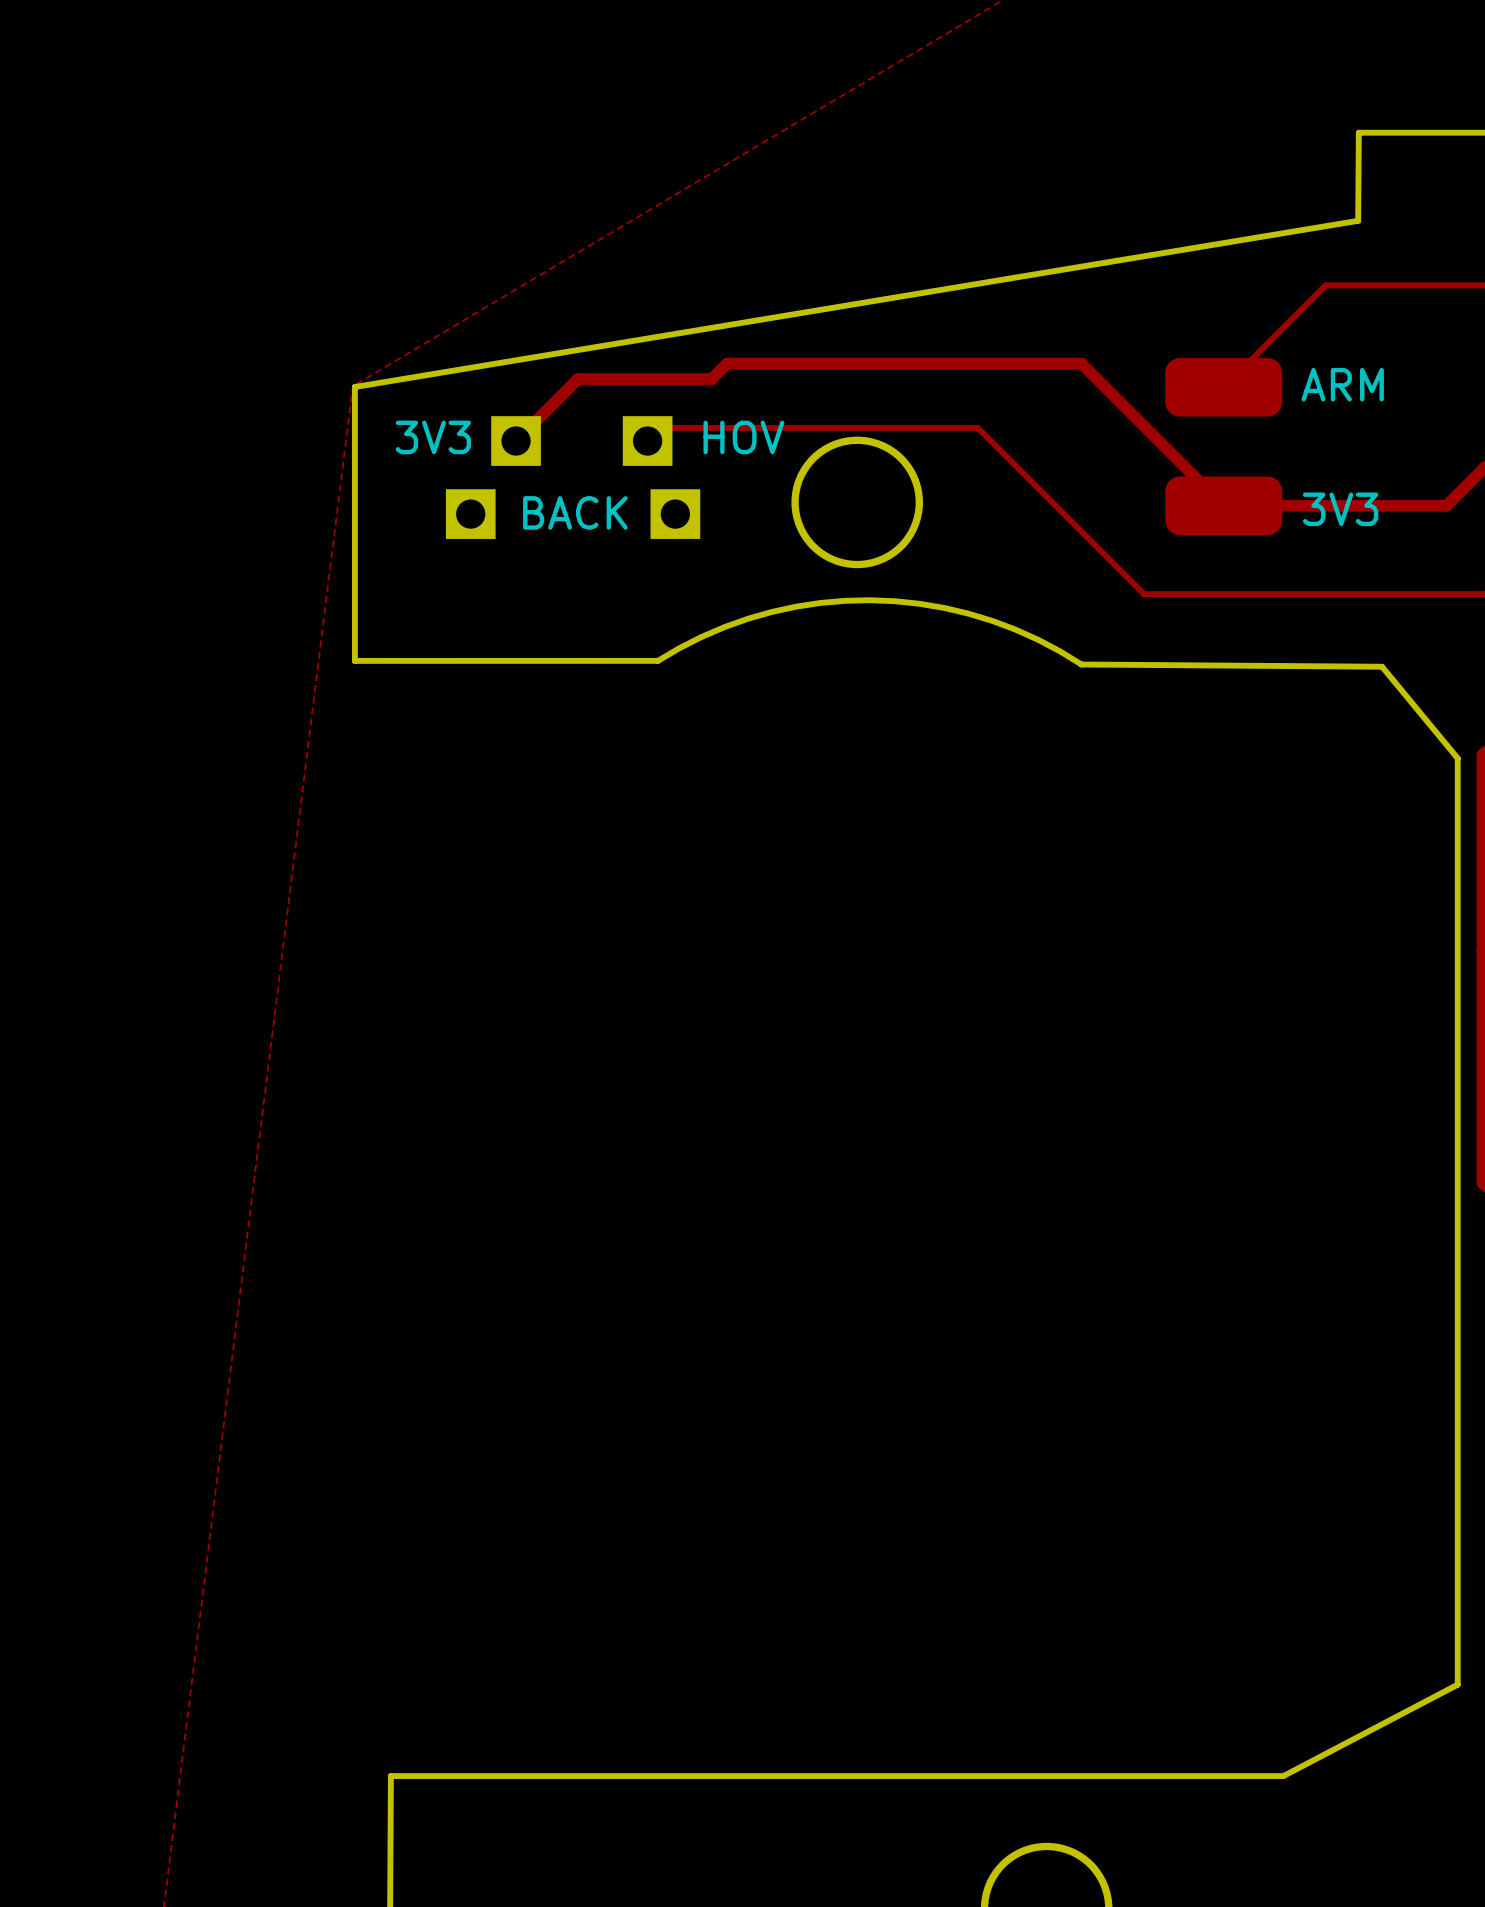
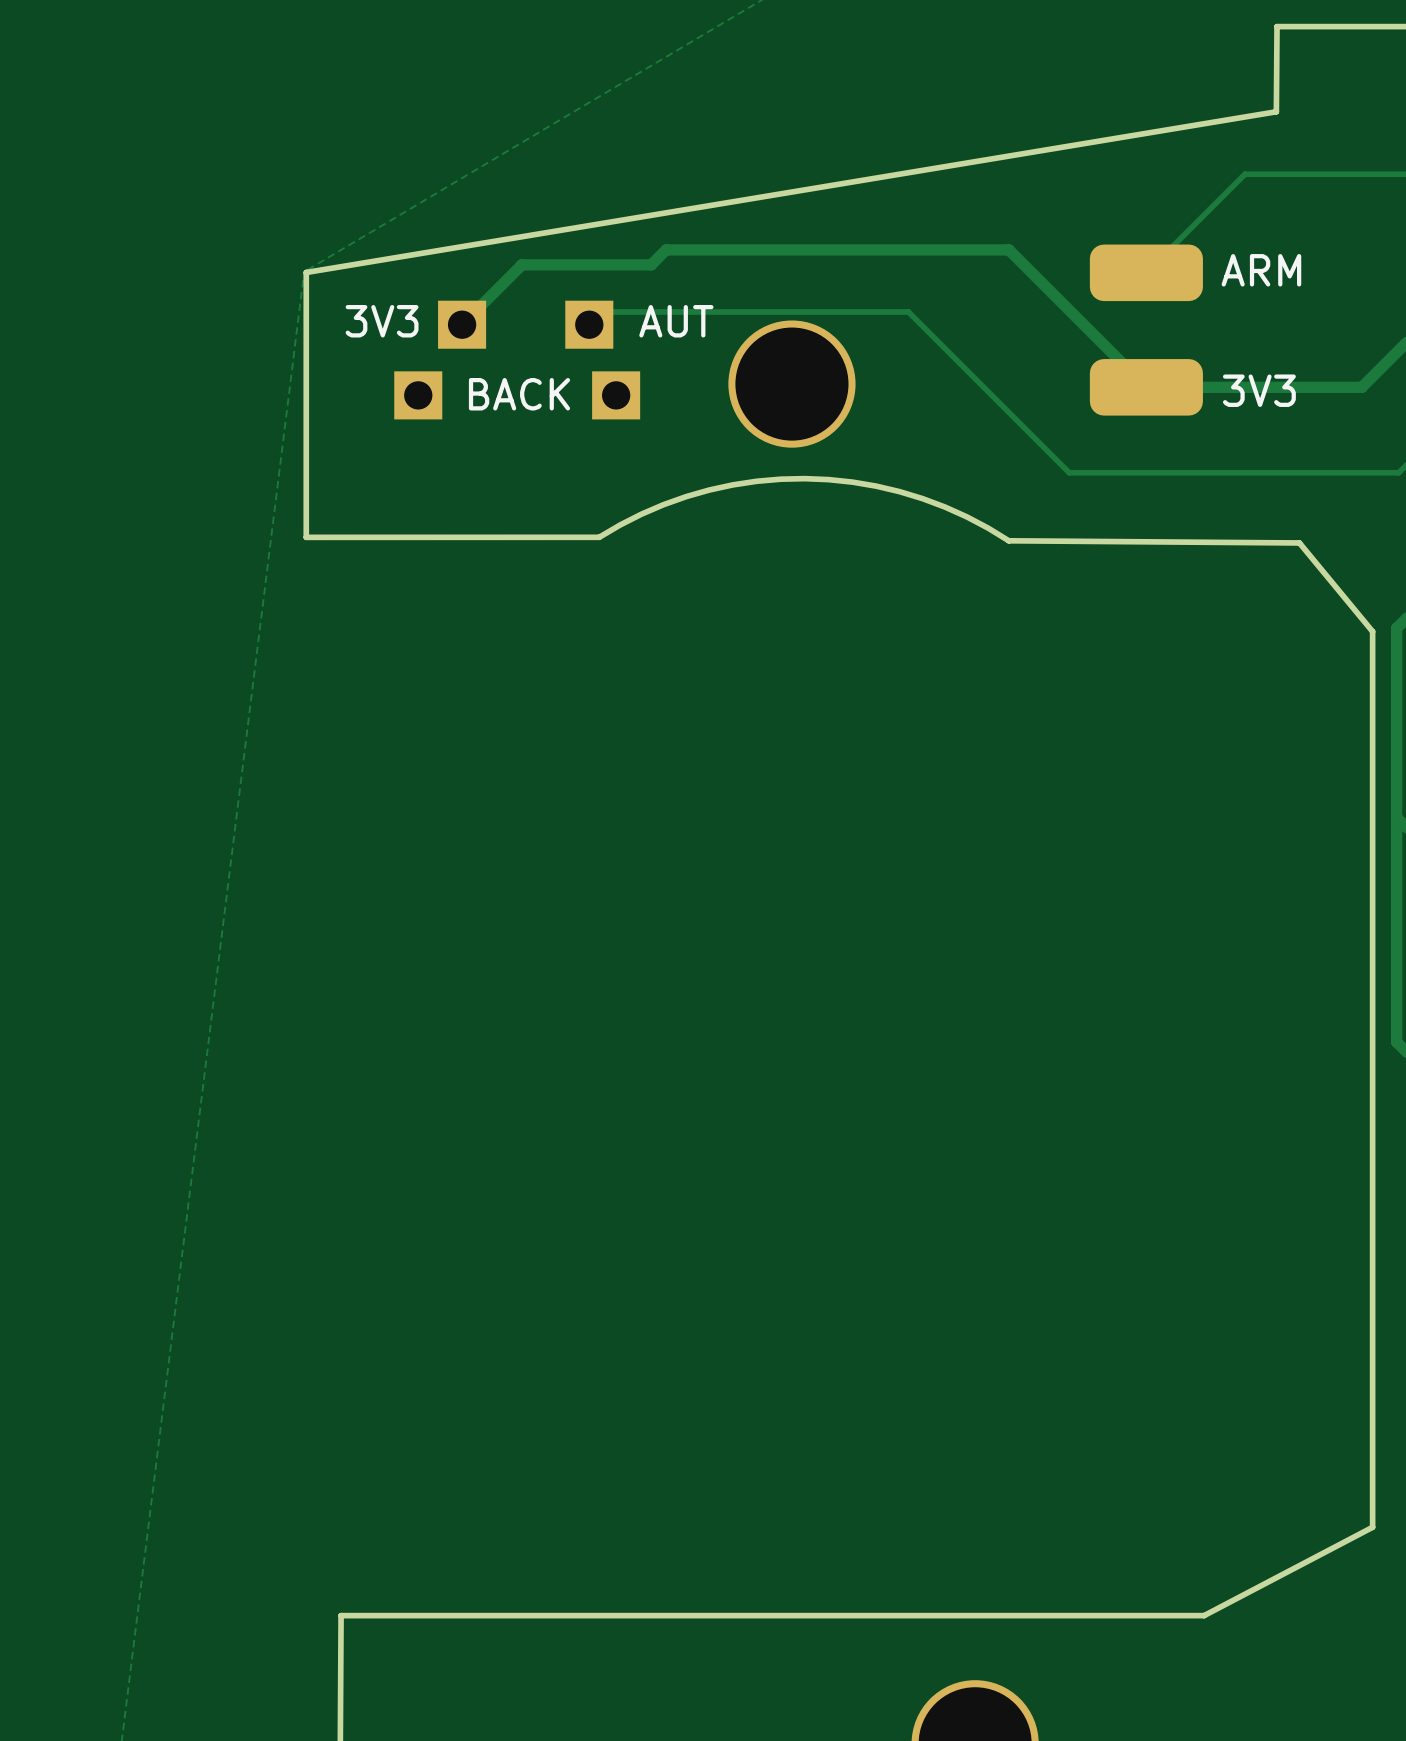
text: HOV (743, 437) -> AUT (676, 321)

